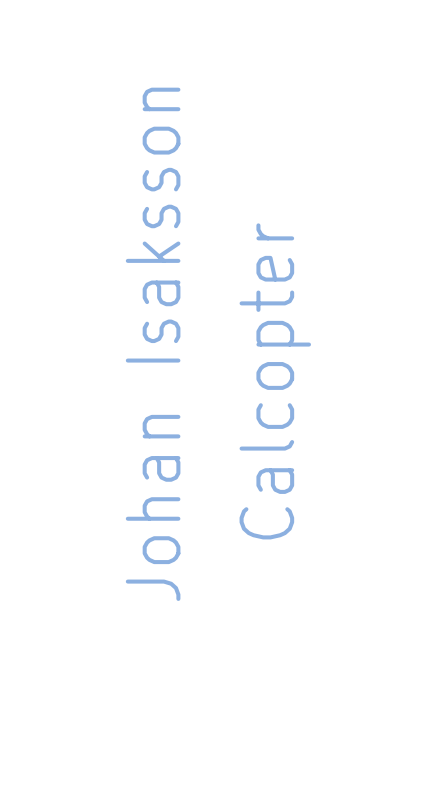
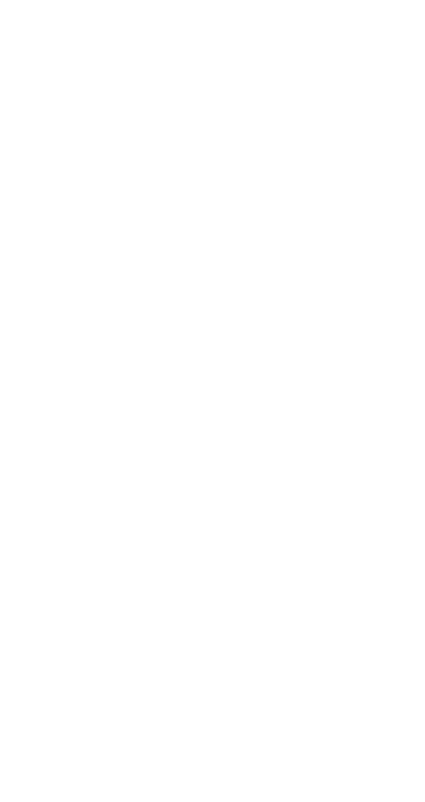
text: Johan Isaksson (153, 344) -> none
text: Calcopter (275, 381) -> none

